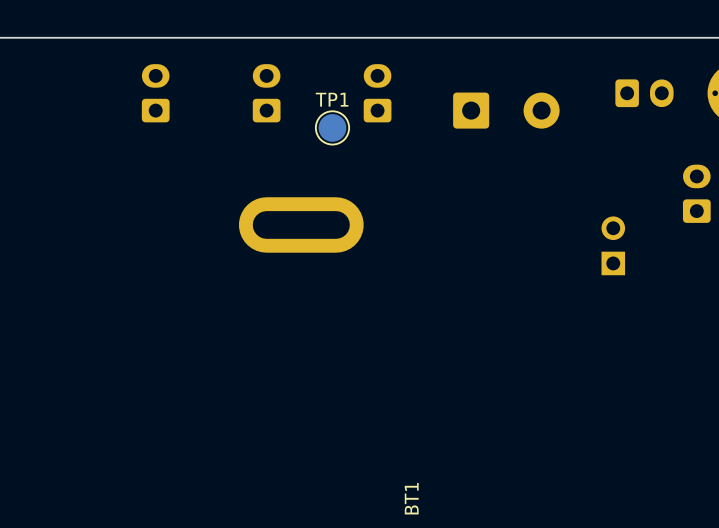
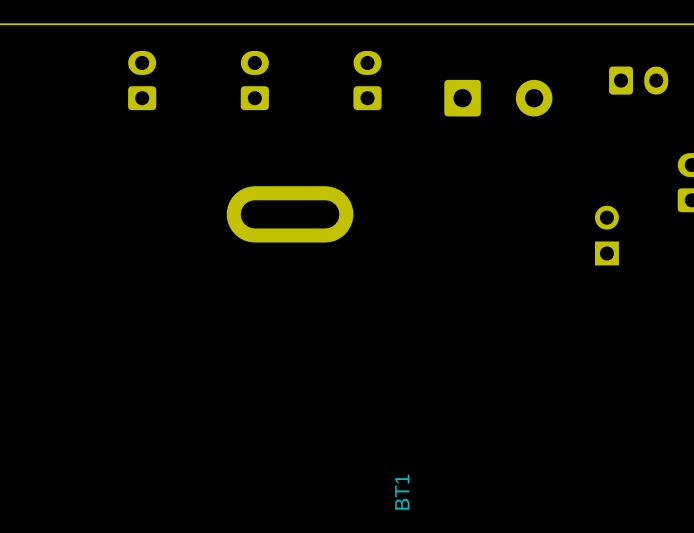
TP1: (332, 127) -> none

